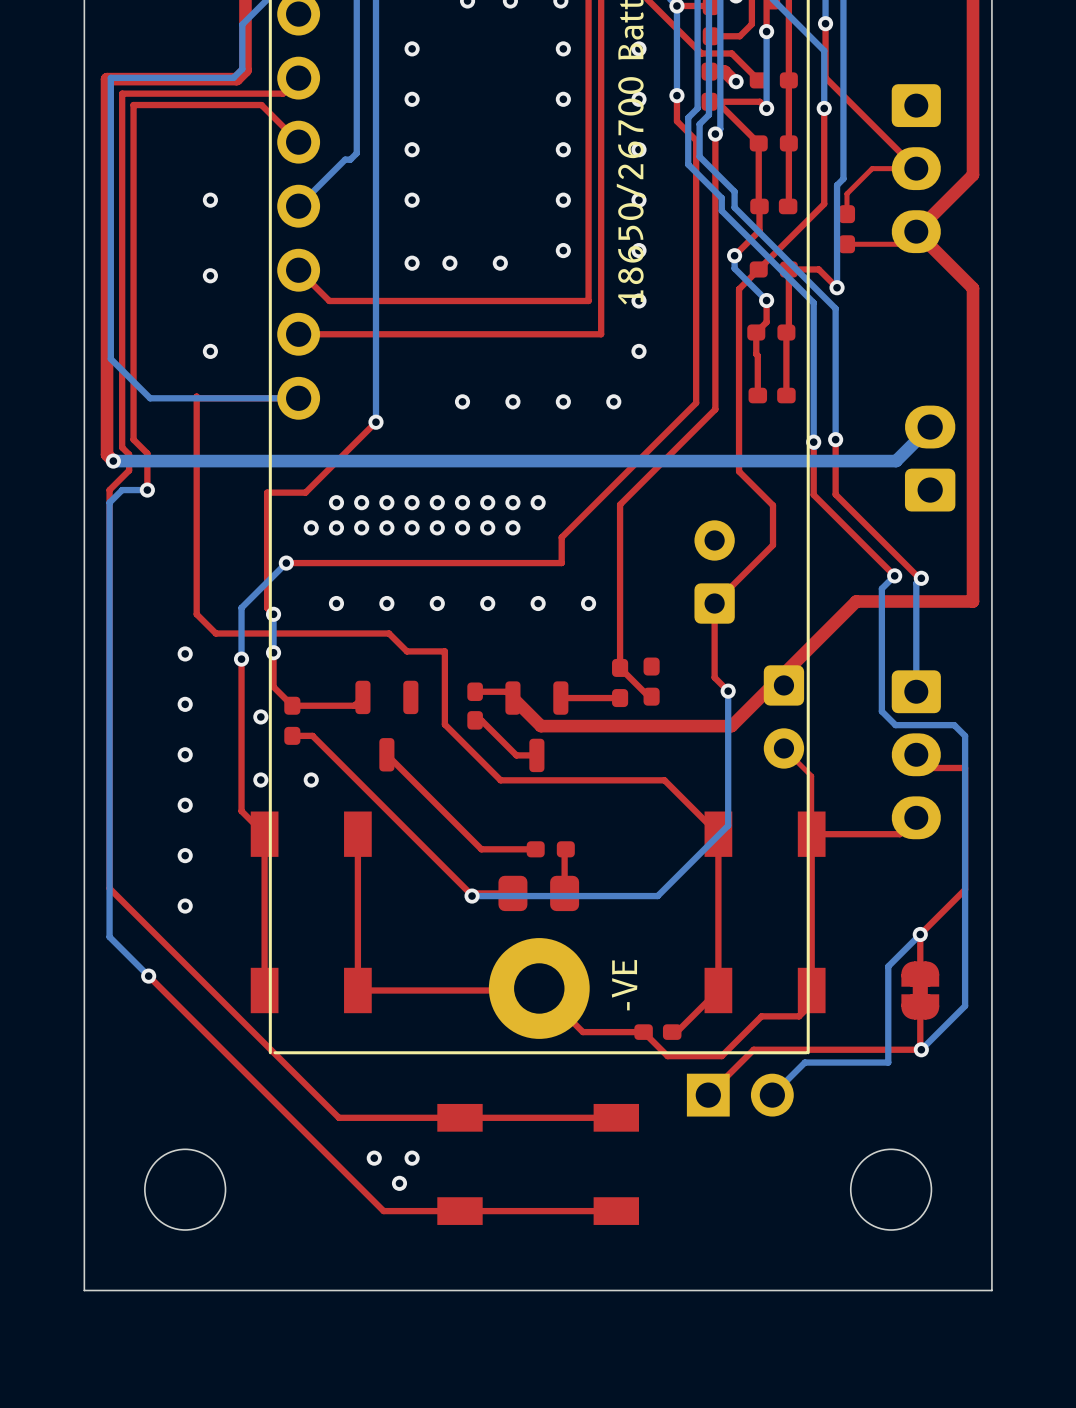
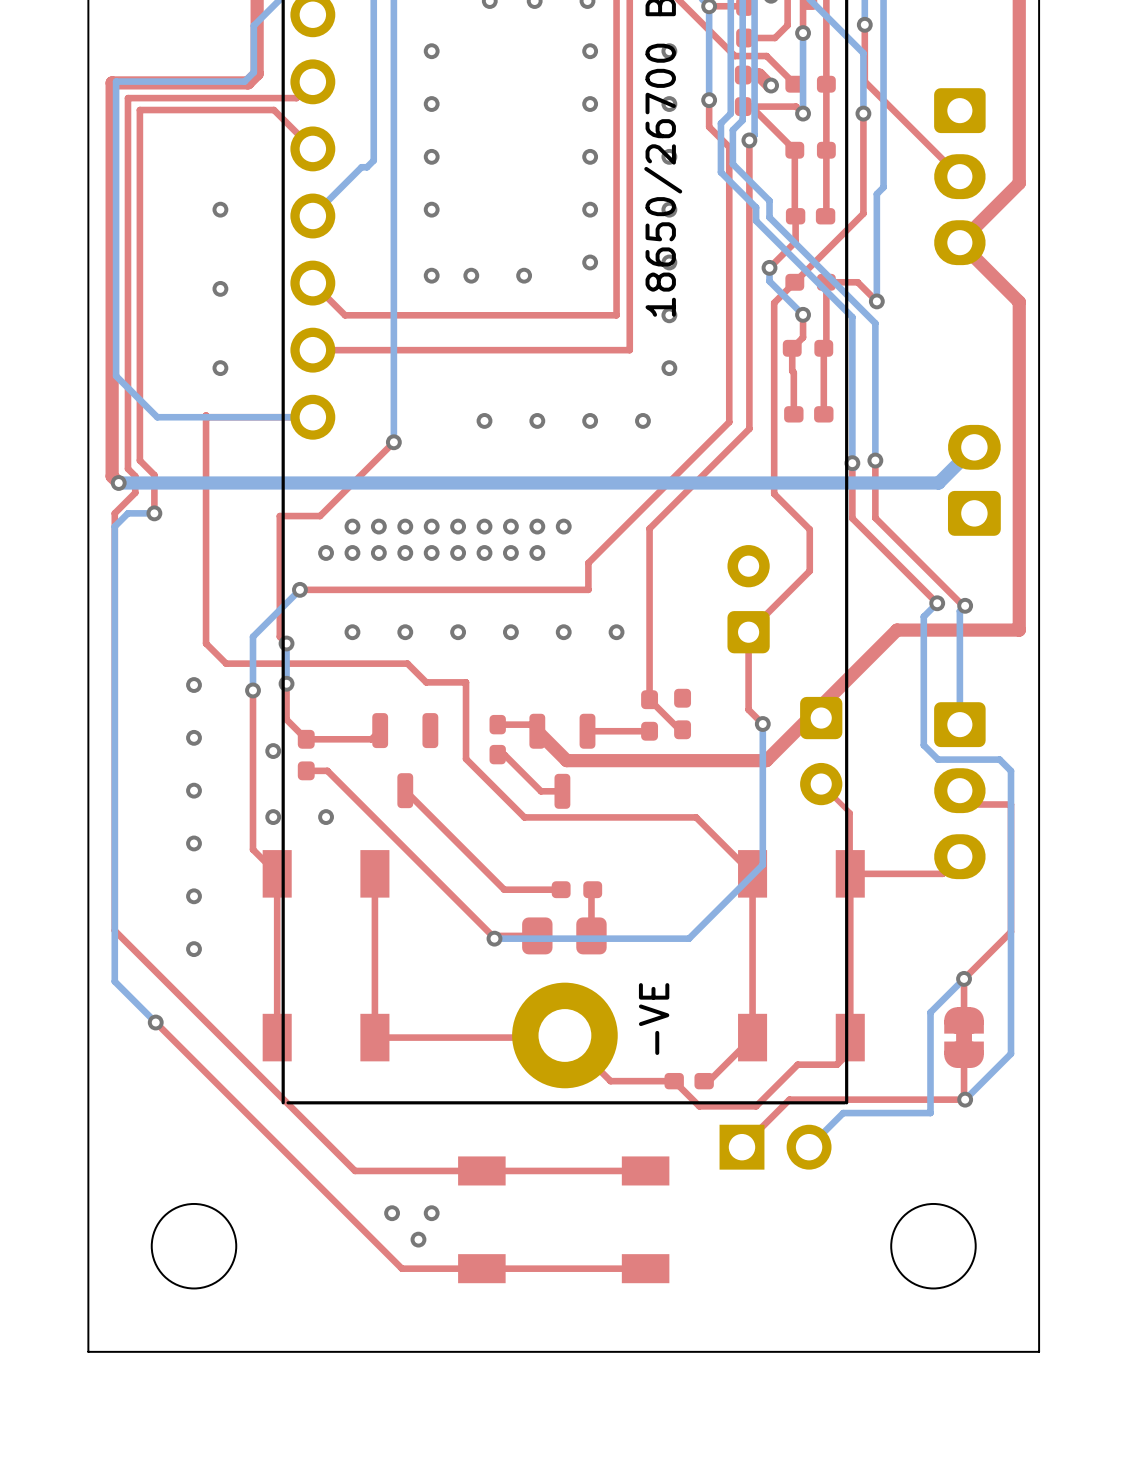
top track: (916, 168) (872, 168) (846, 193) (846, 214) -> none
part: (846, 229) -> none
top track: (916, 231) (903, 244) (846, 244) -> none

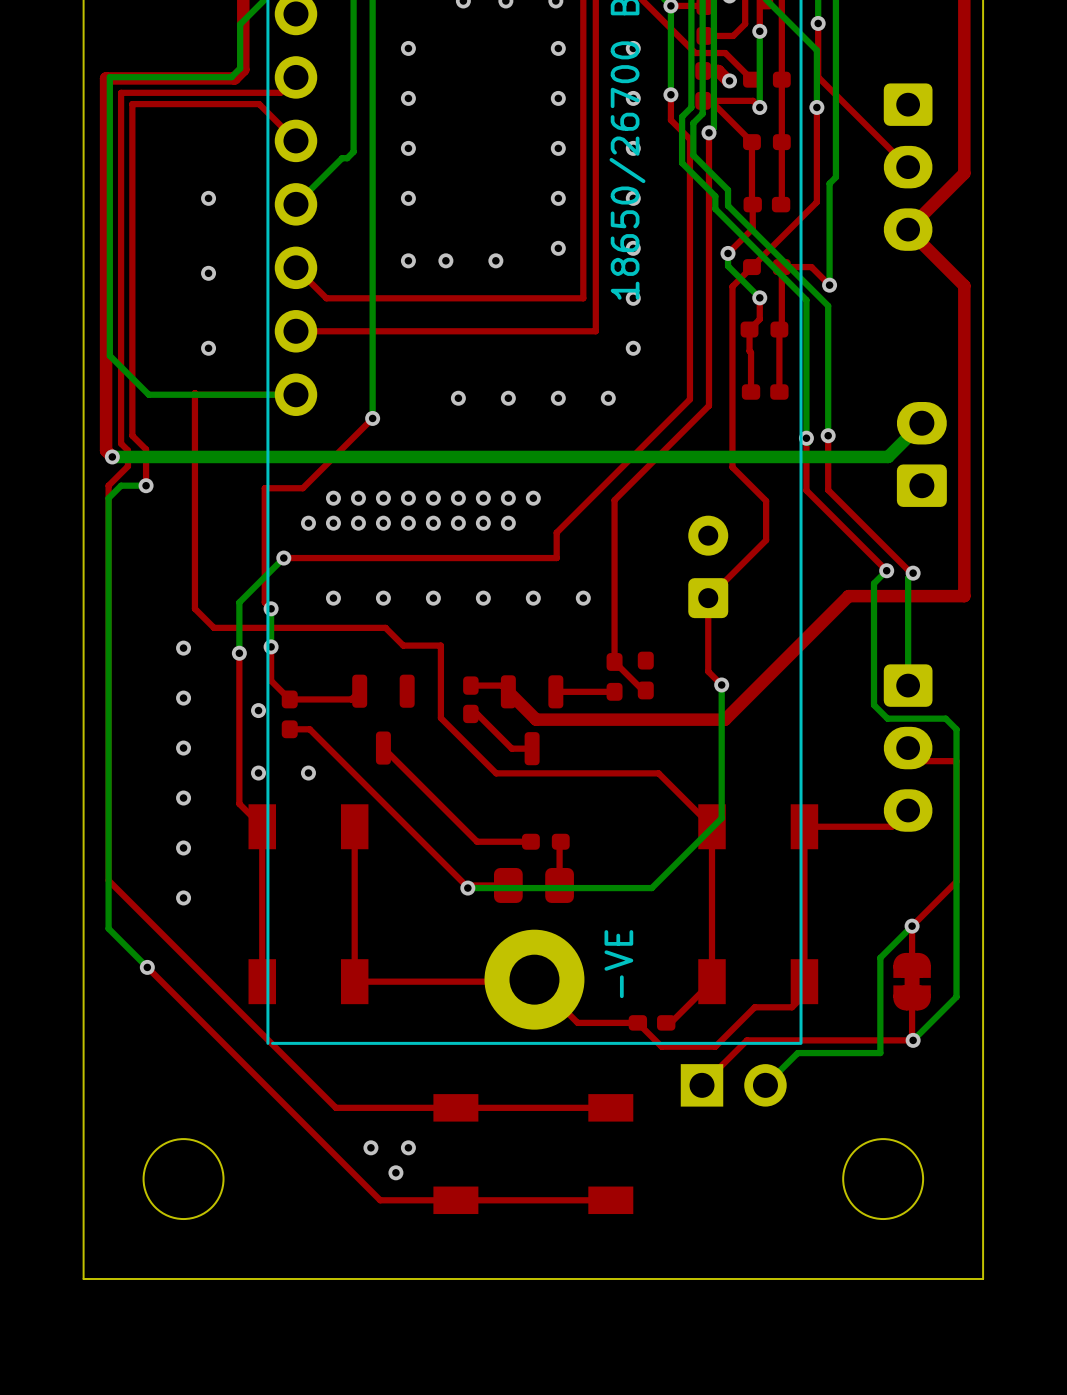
part: (821, 751) -> none
top track: (821, 784) (850, 813) (850, 873) -> none

